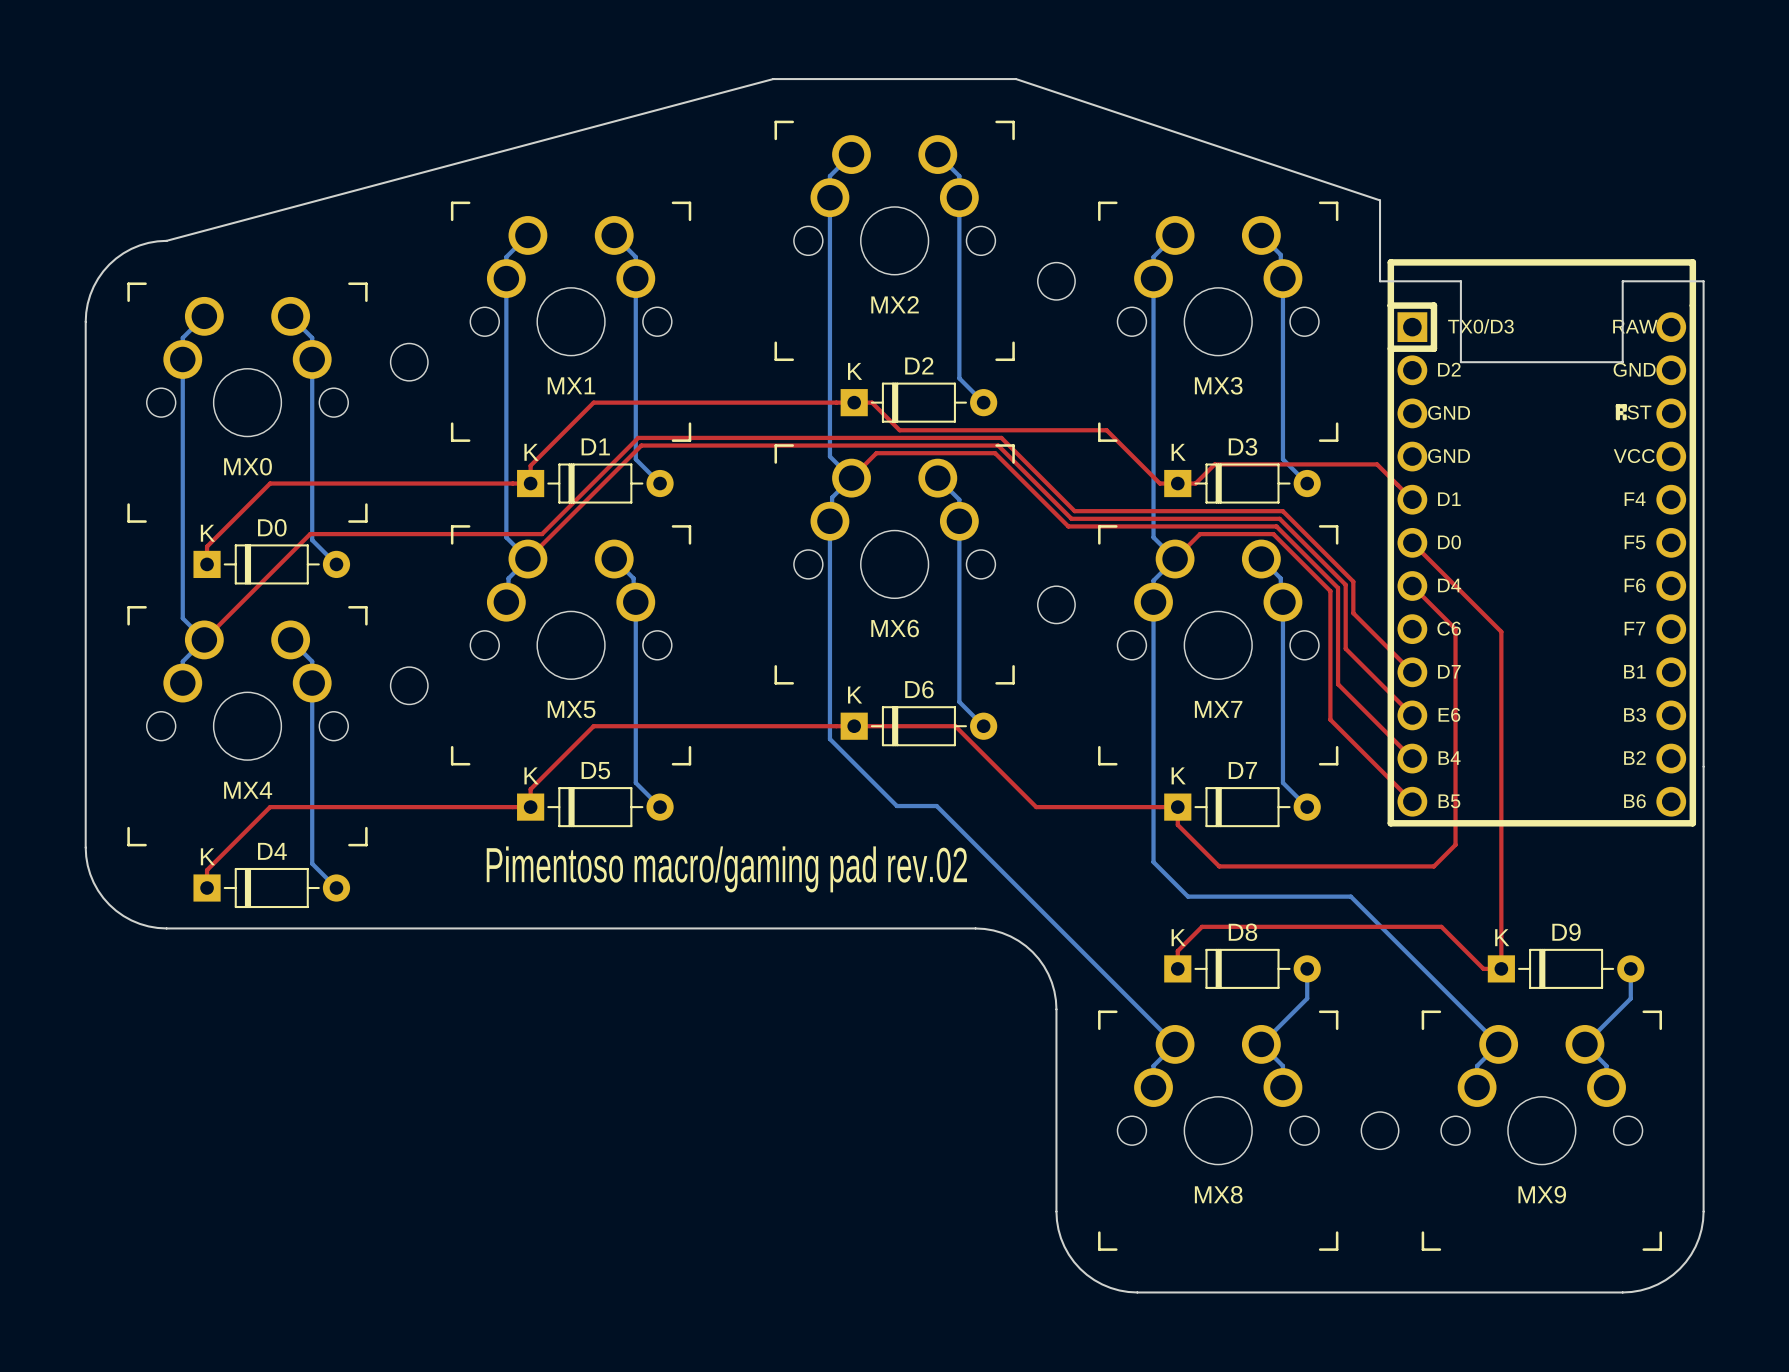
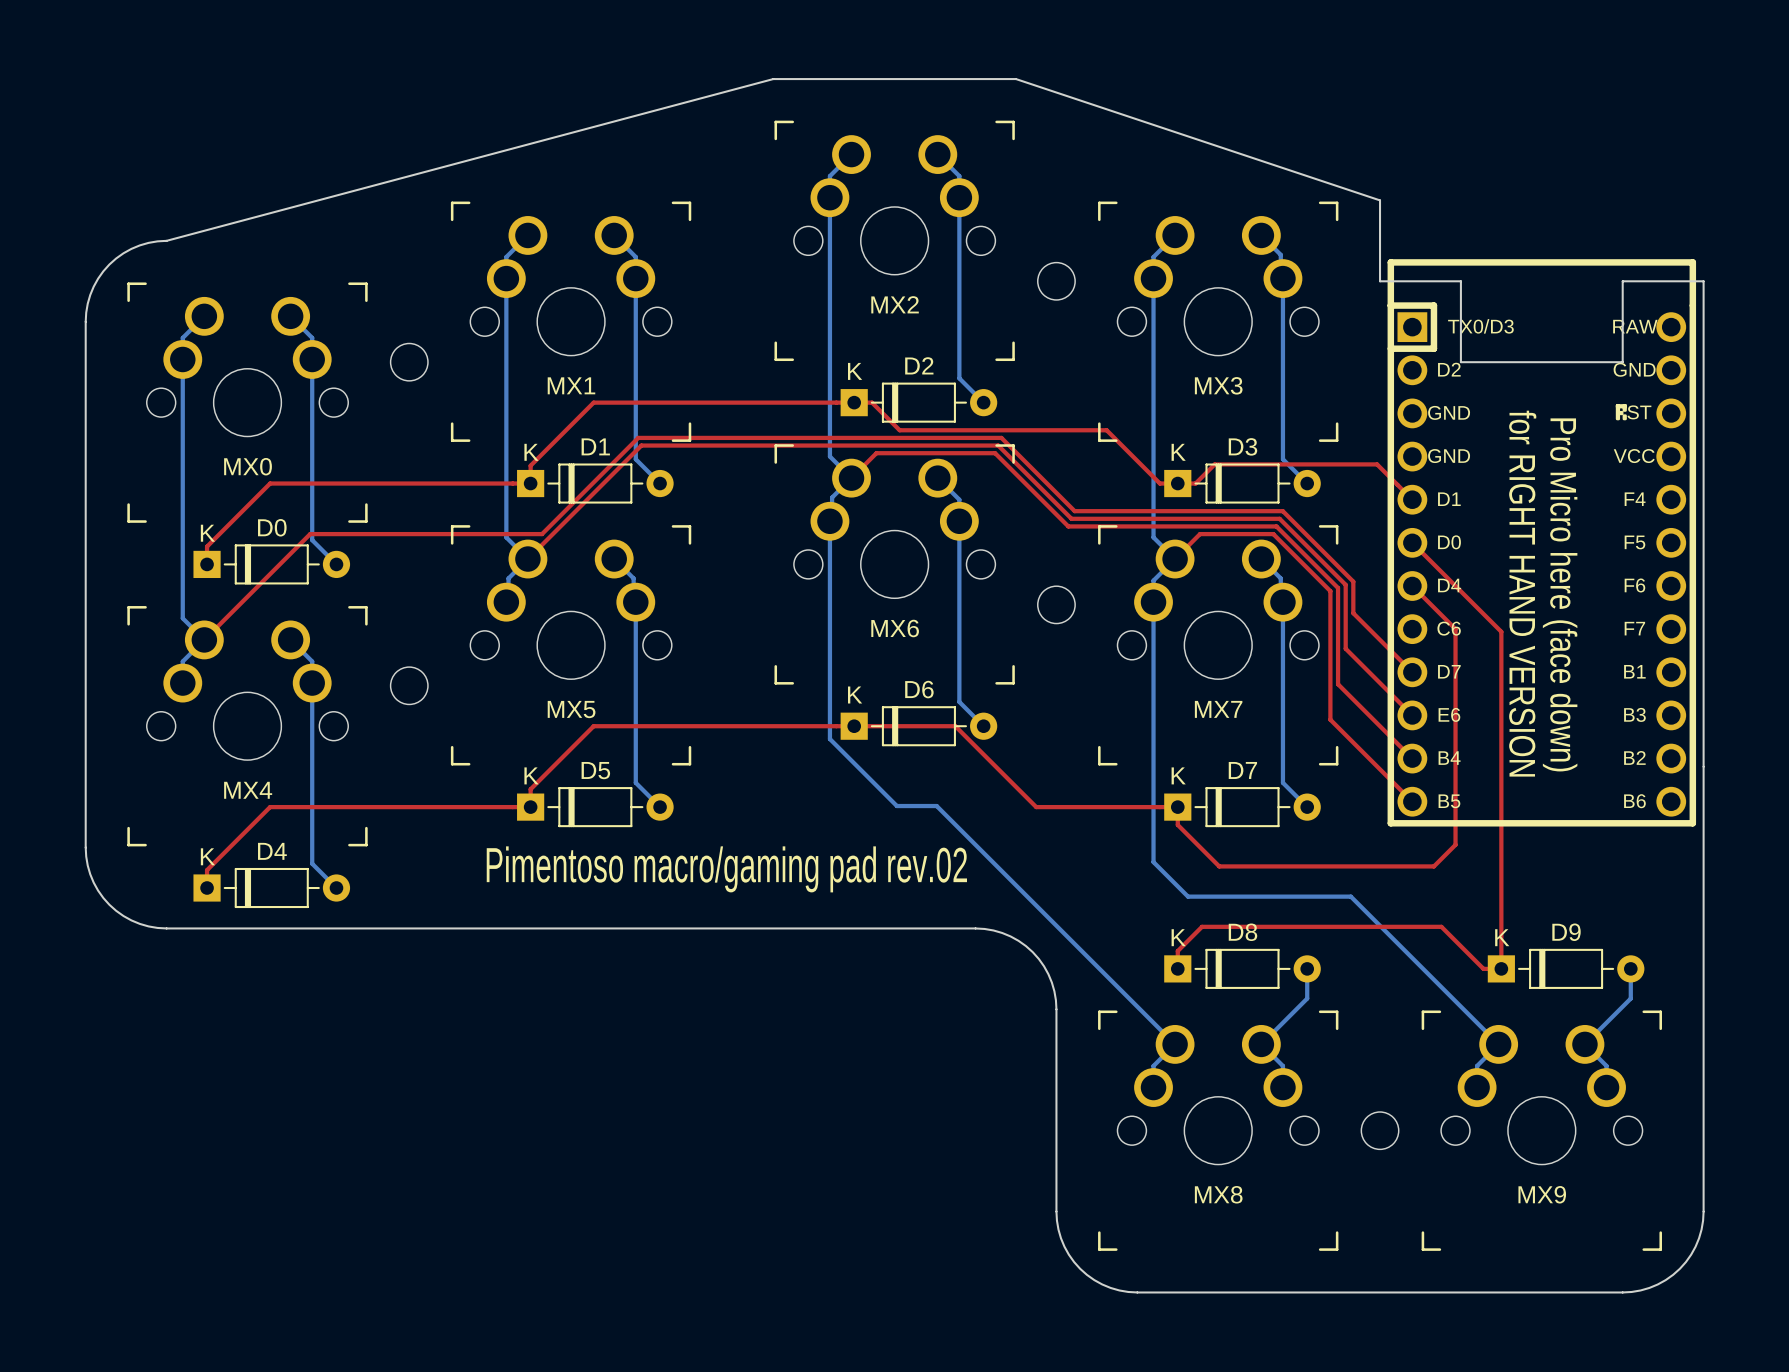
text: none -> for RIGHT HAND VERSION (1522, 593)
text: none -> Pro Micro here (face down) (1560, 594)

